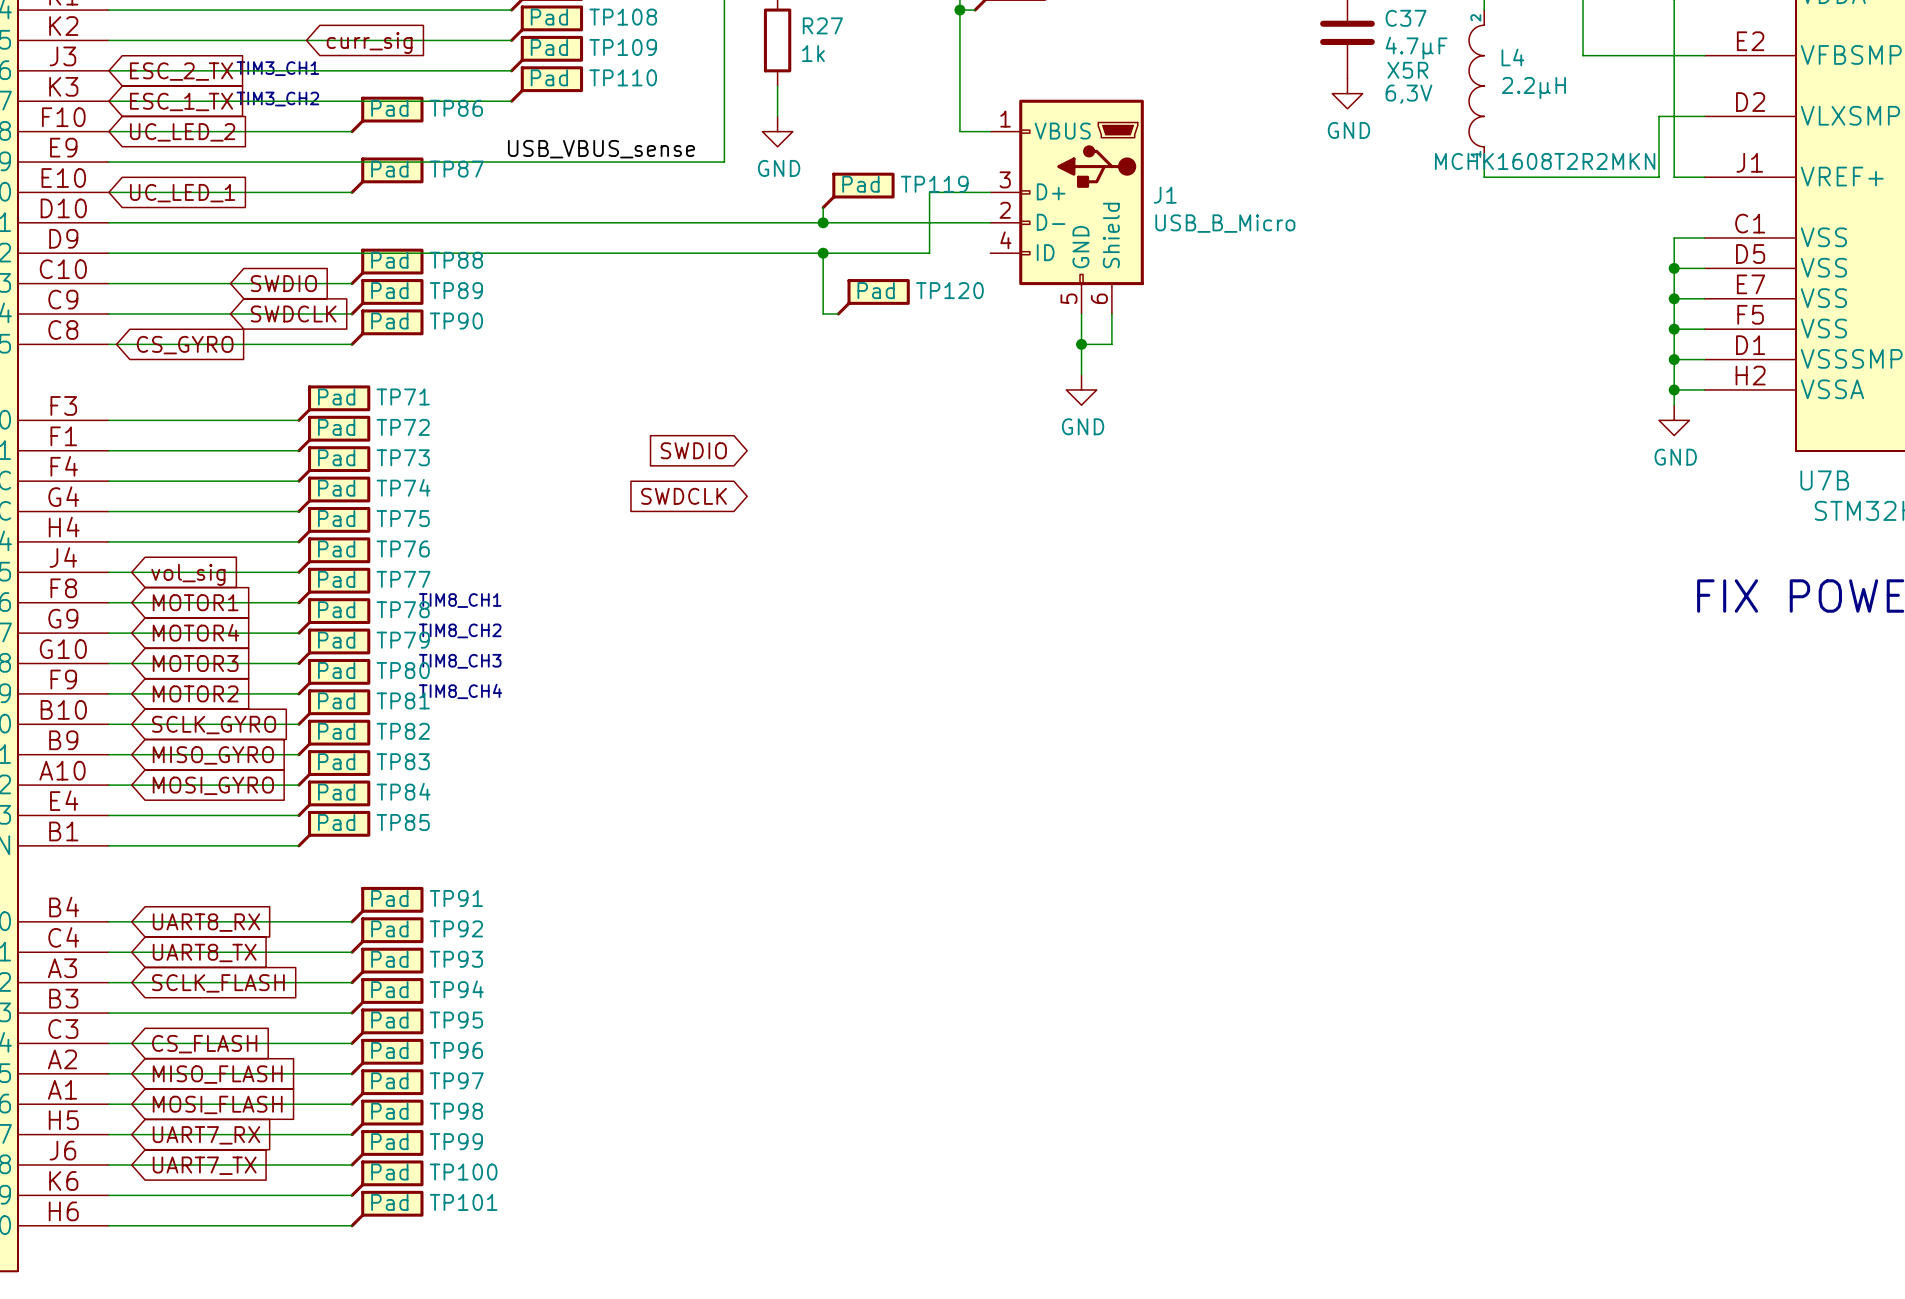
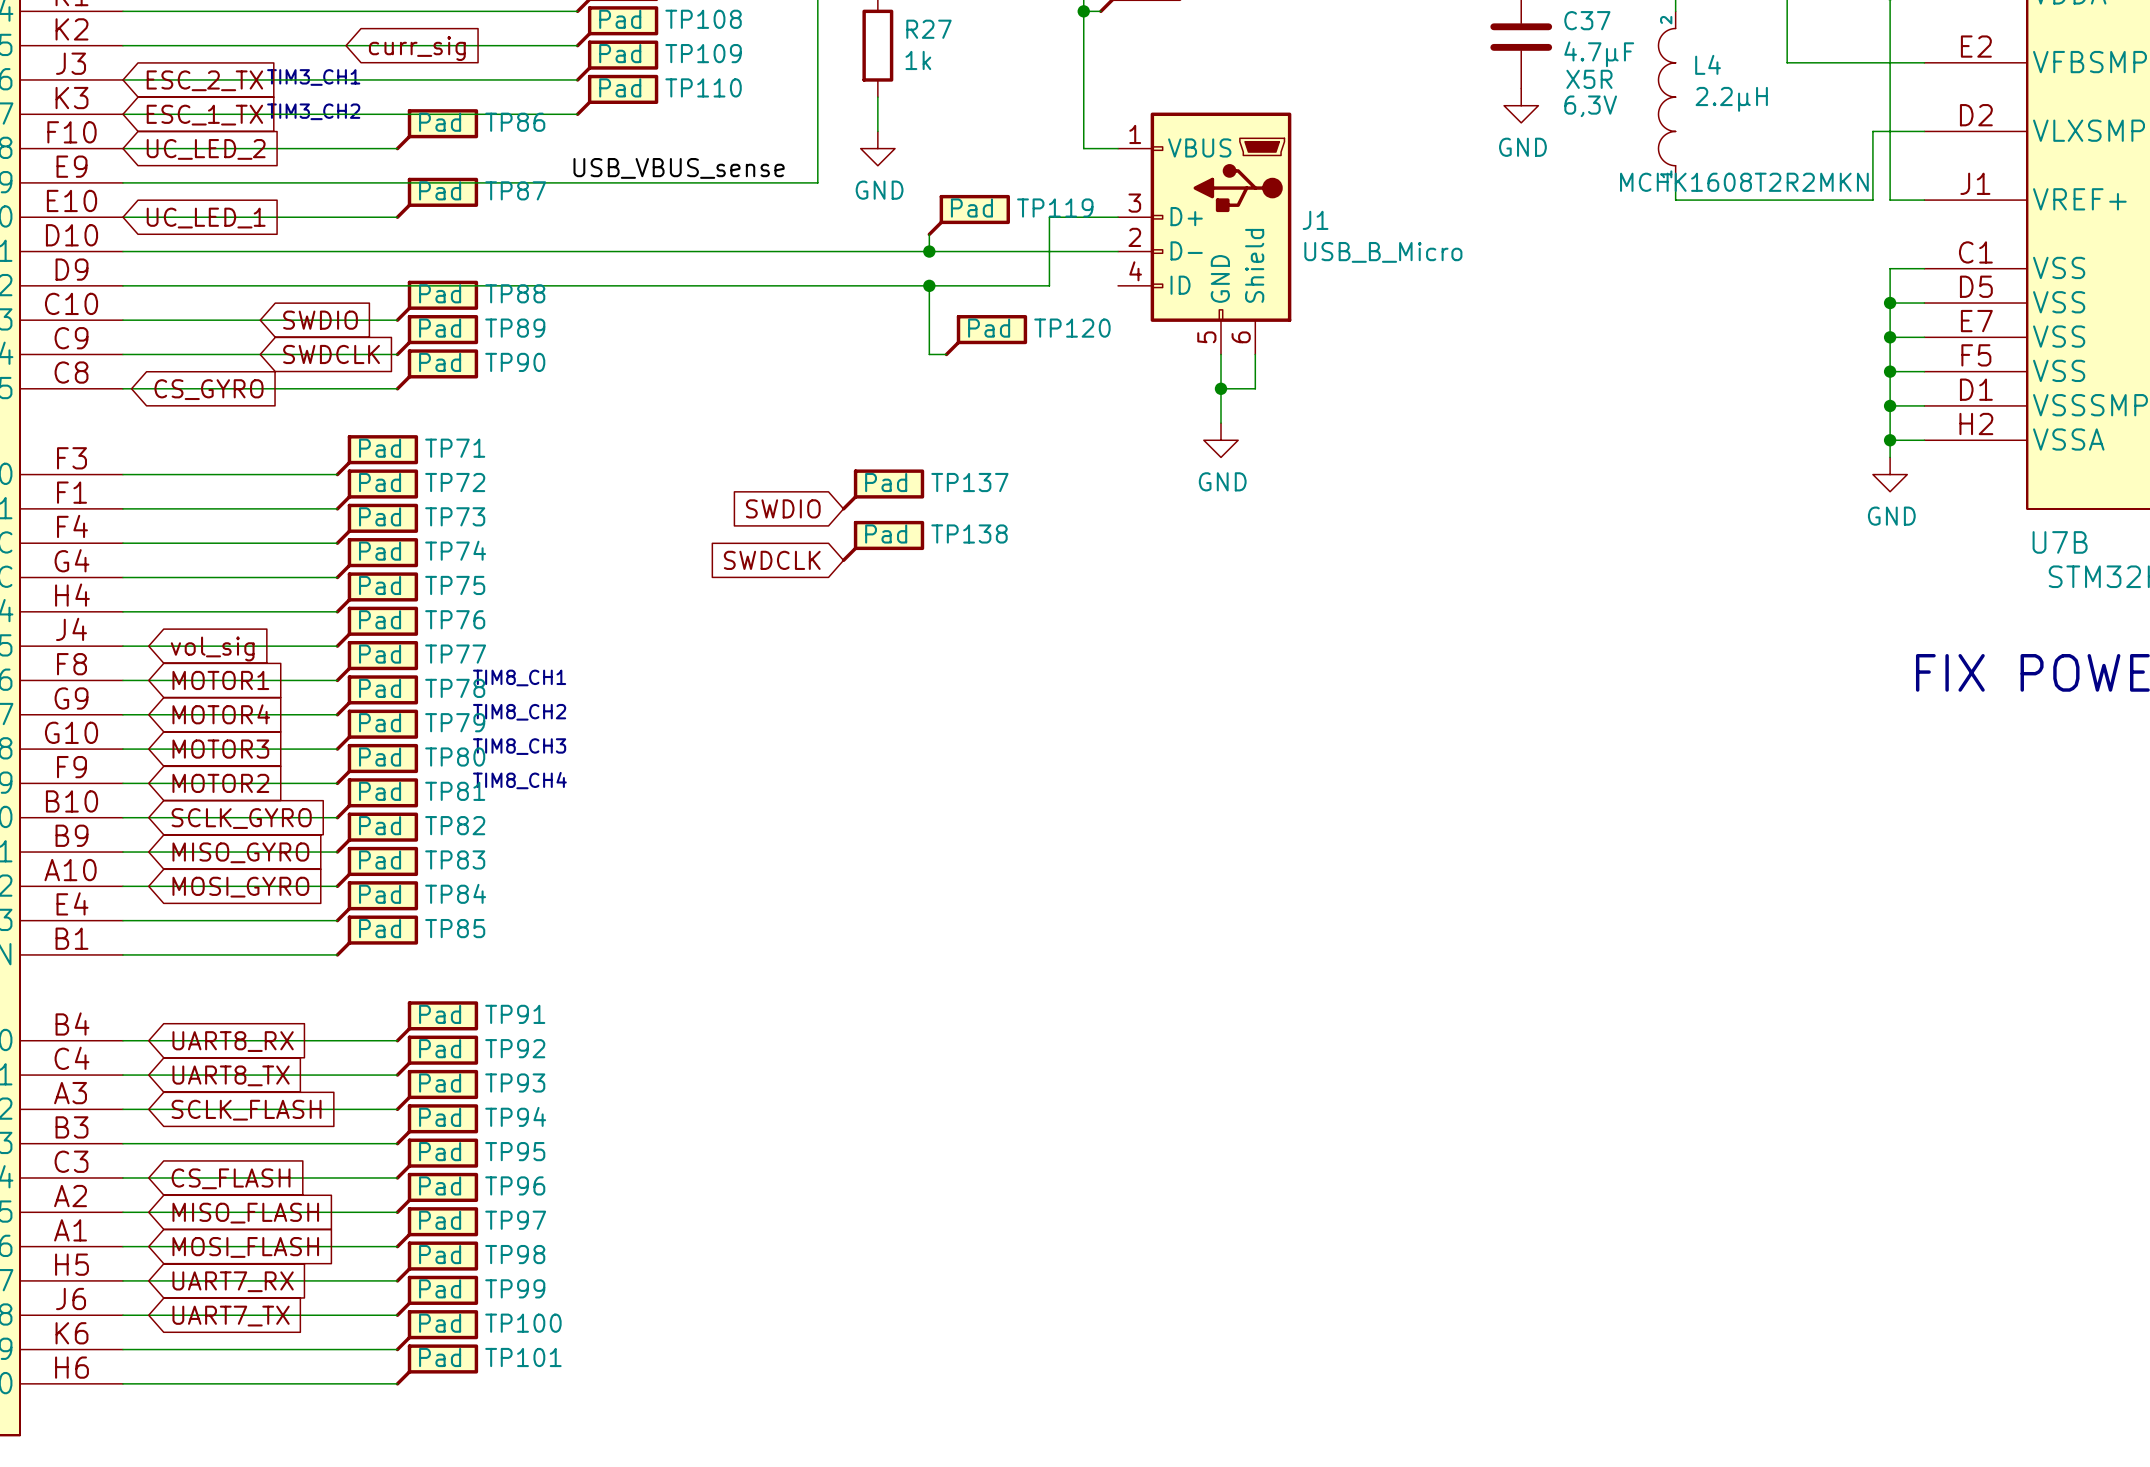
TP137: none -> Pad (883, 490)
TP138: none -> Pad (883, 541)

